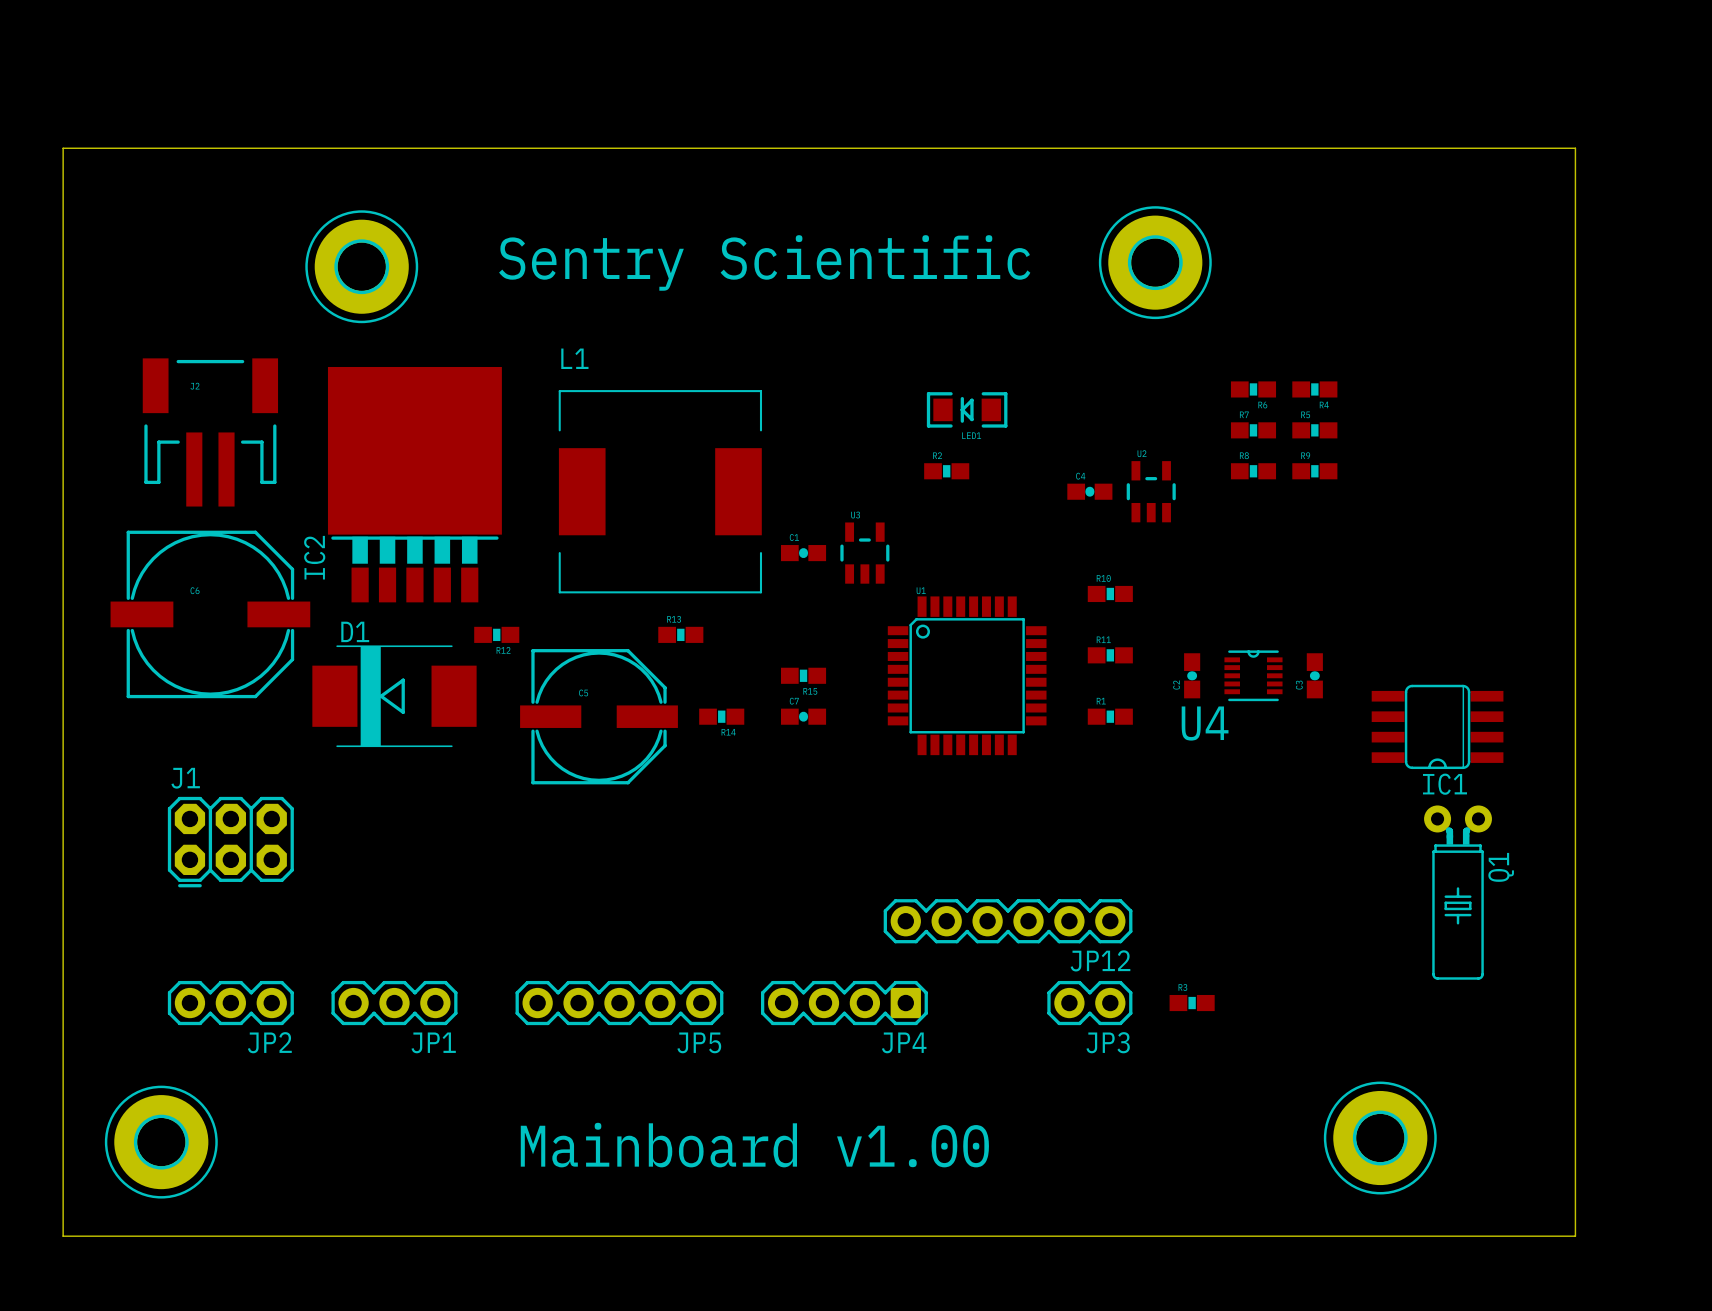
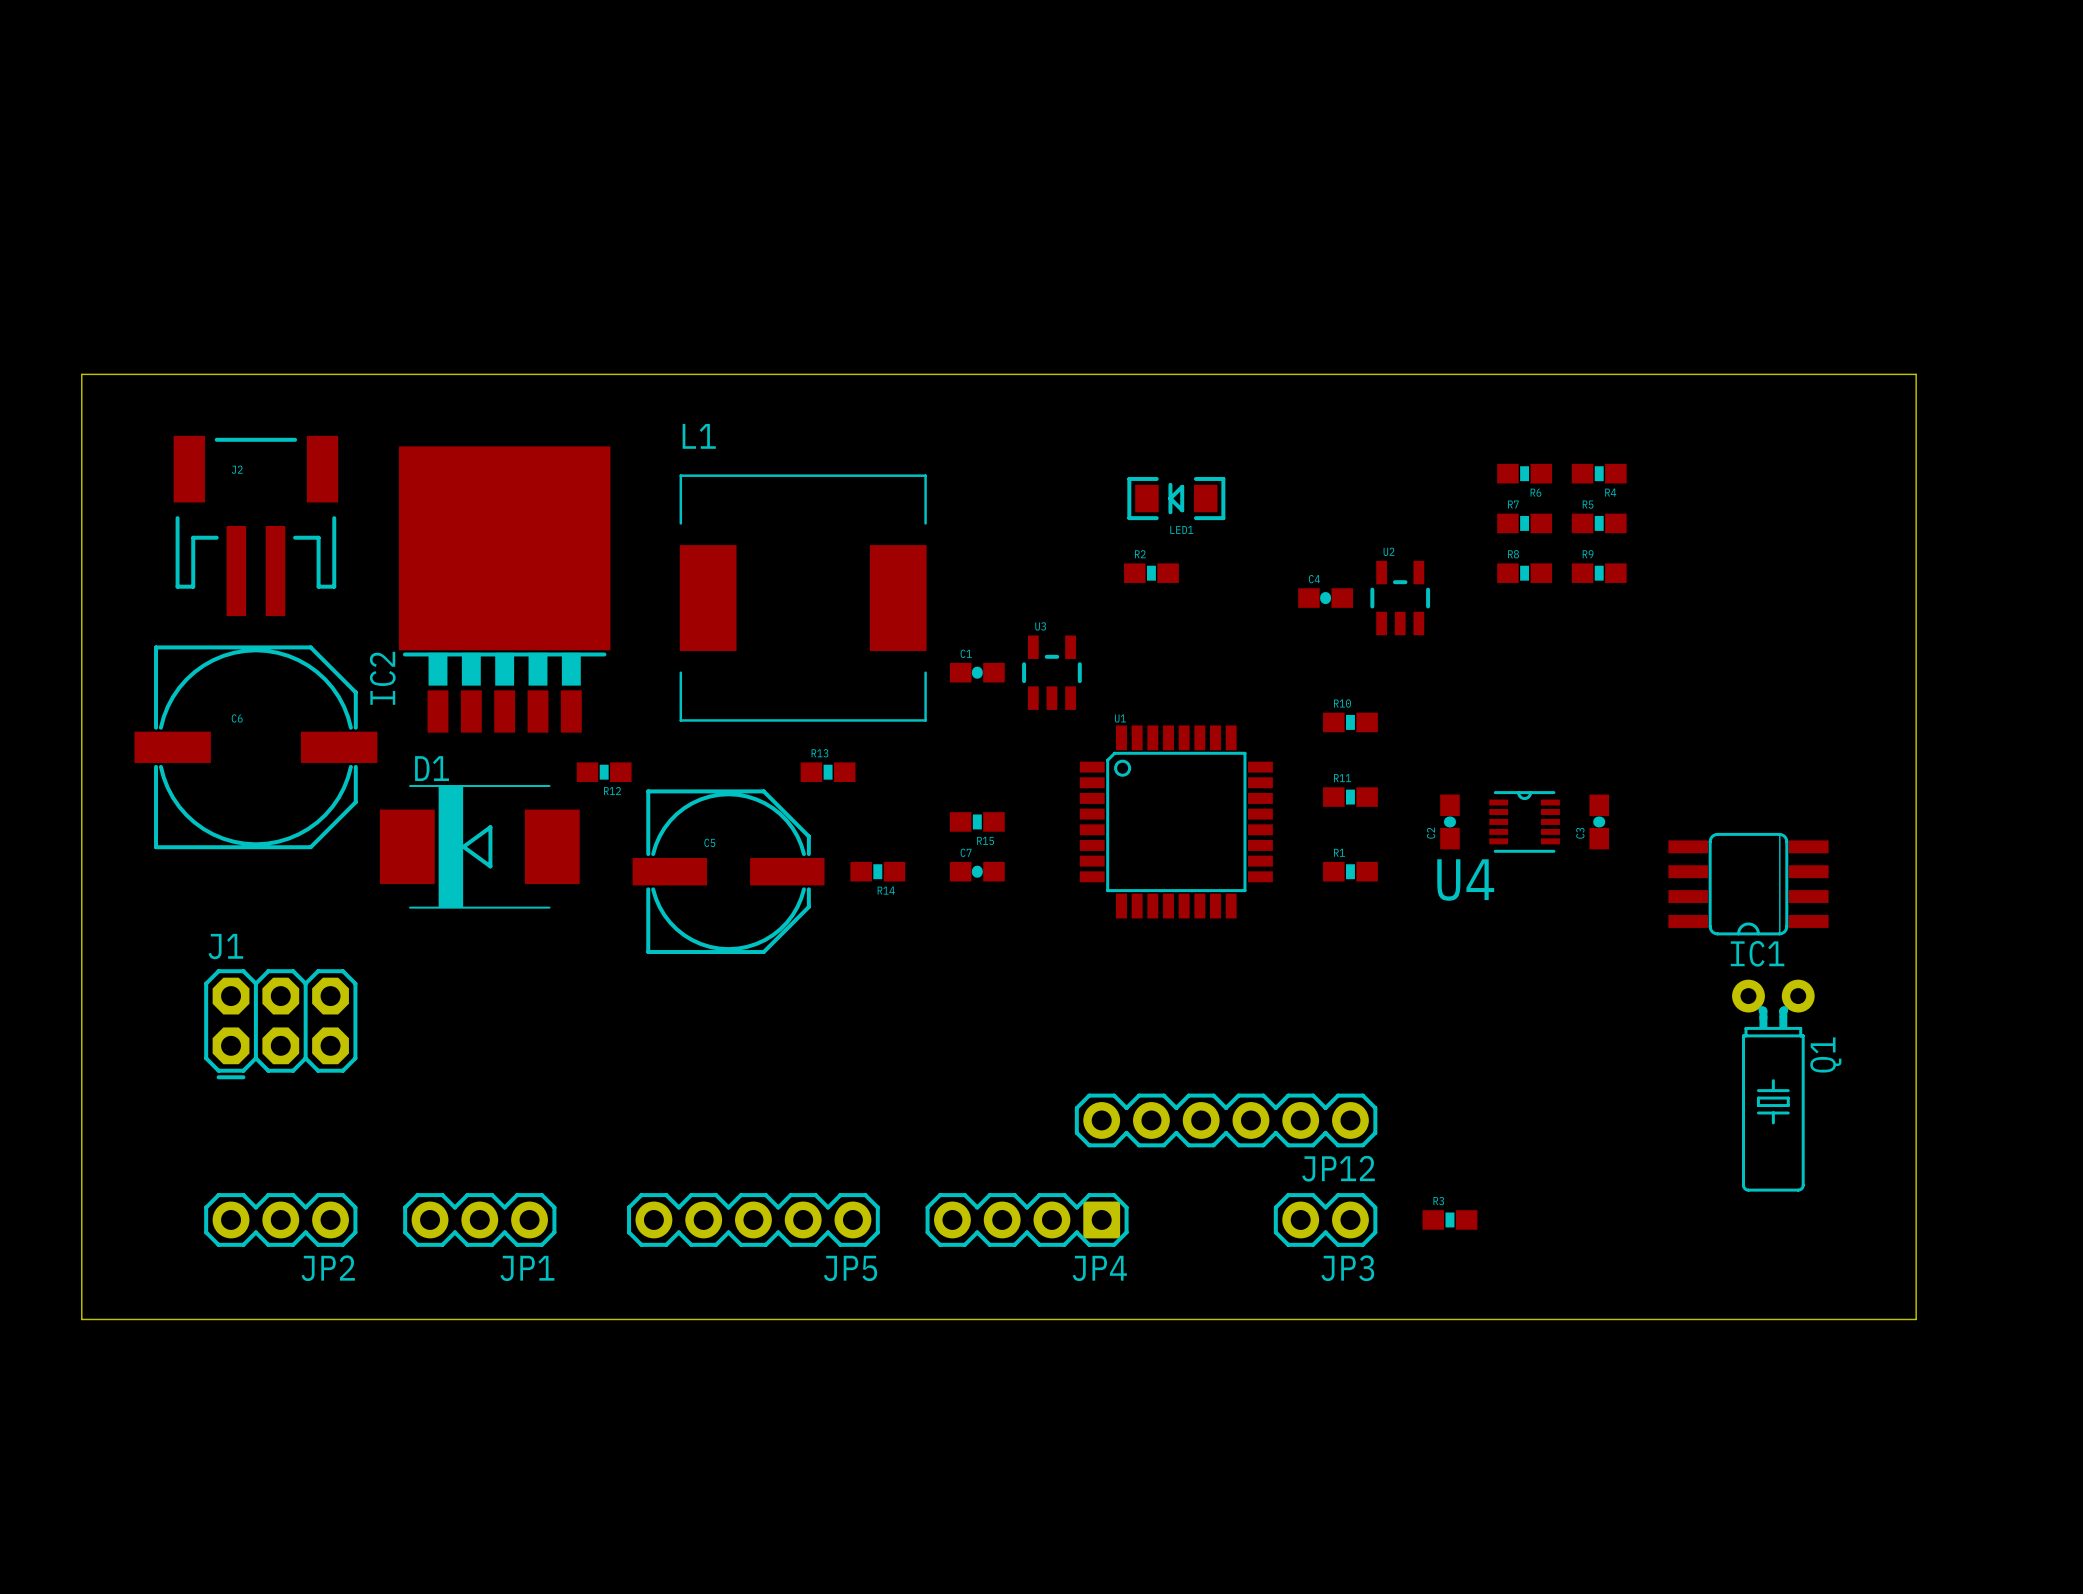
text: Sentry Scientific (764, 262) -> none
part: (1155, 262) -> none
part: (361, 266) -> none
board edge: (1575, 307) (1575, 148) (63, 148) (63, 1236) (1575, 1236) (1575, 1084) -> (1916, 374) (81, 374) (81, 1319) (1916, 1319)
part: (1380, 1138) -> none
part: (161, 1142) -> none
text: Mainboard v1.00 (754, 1145) -> none

